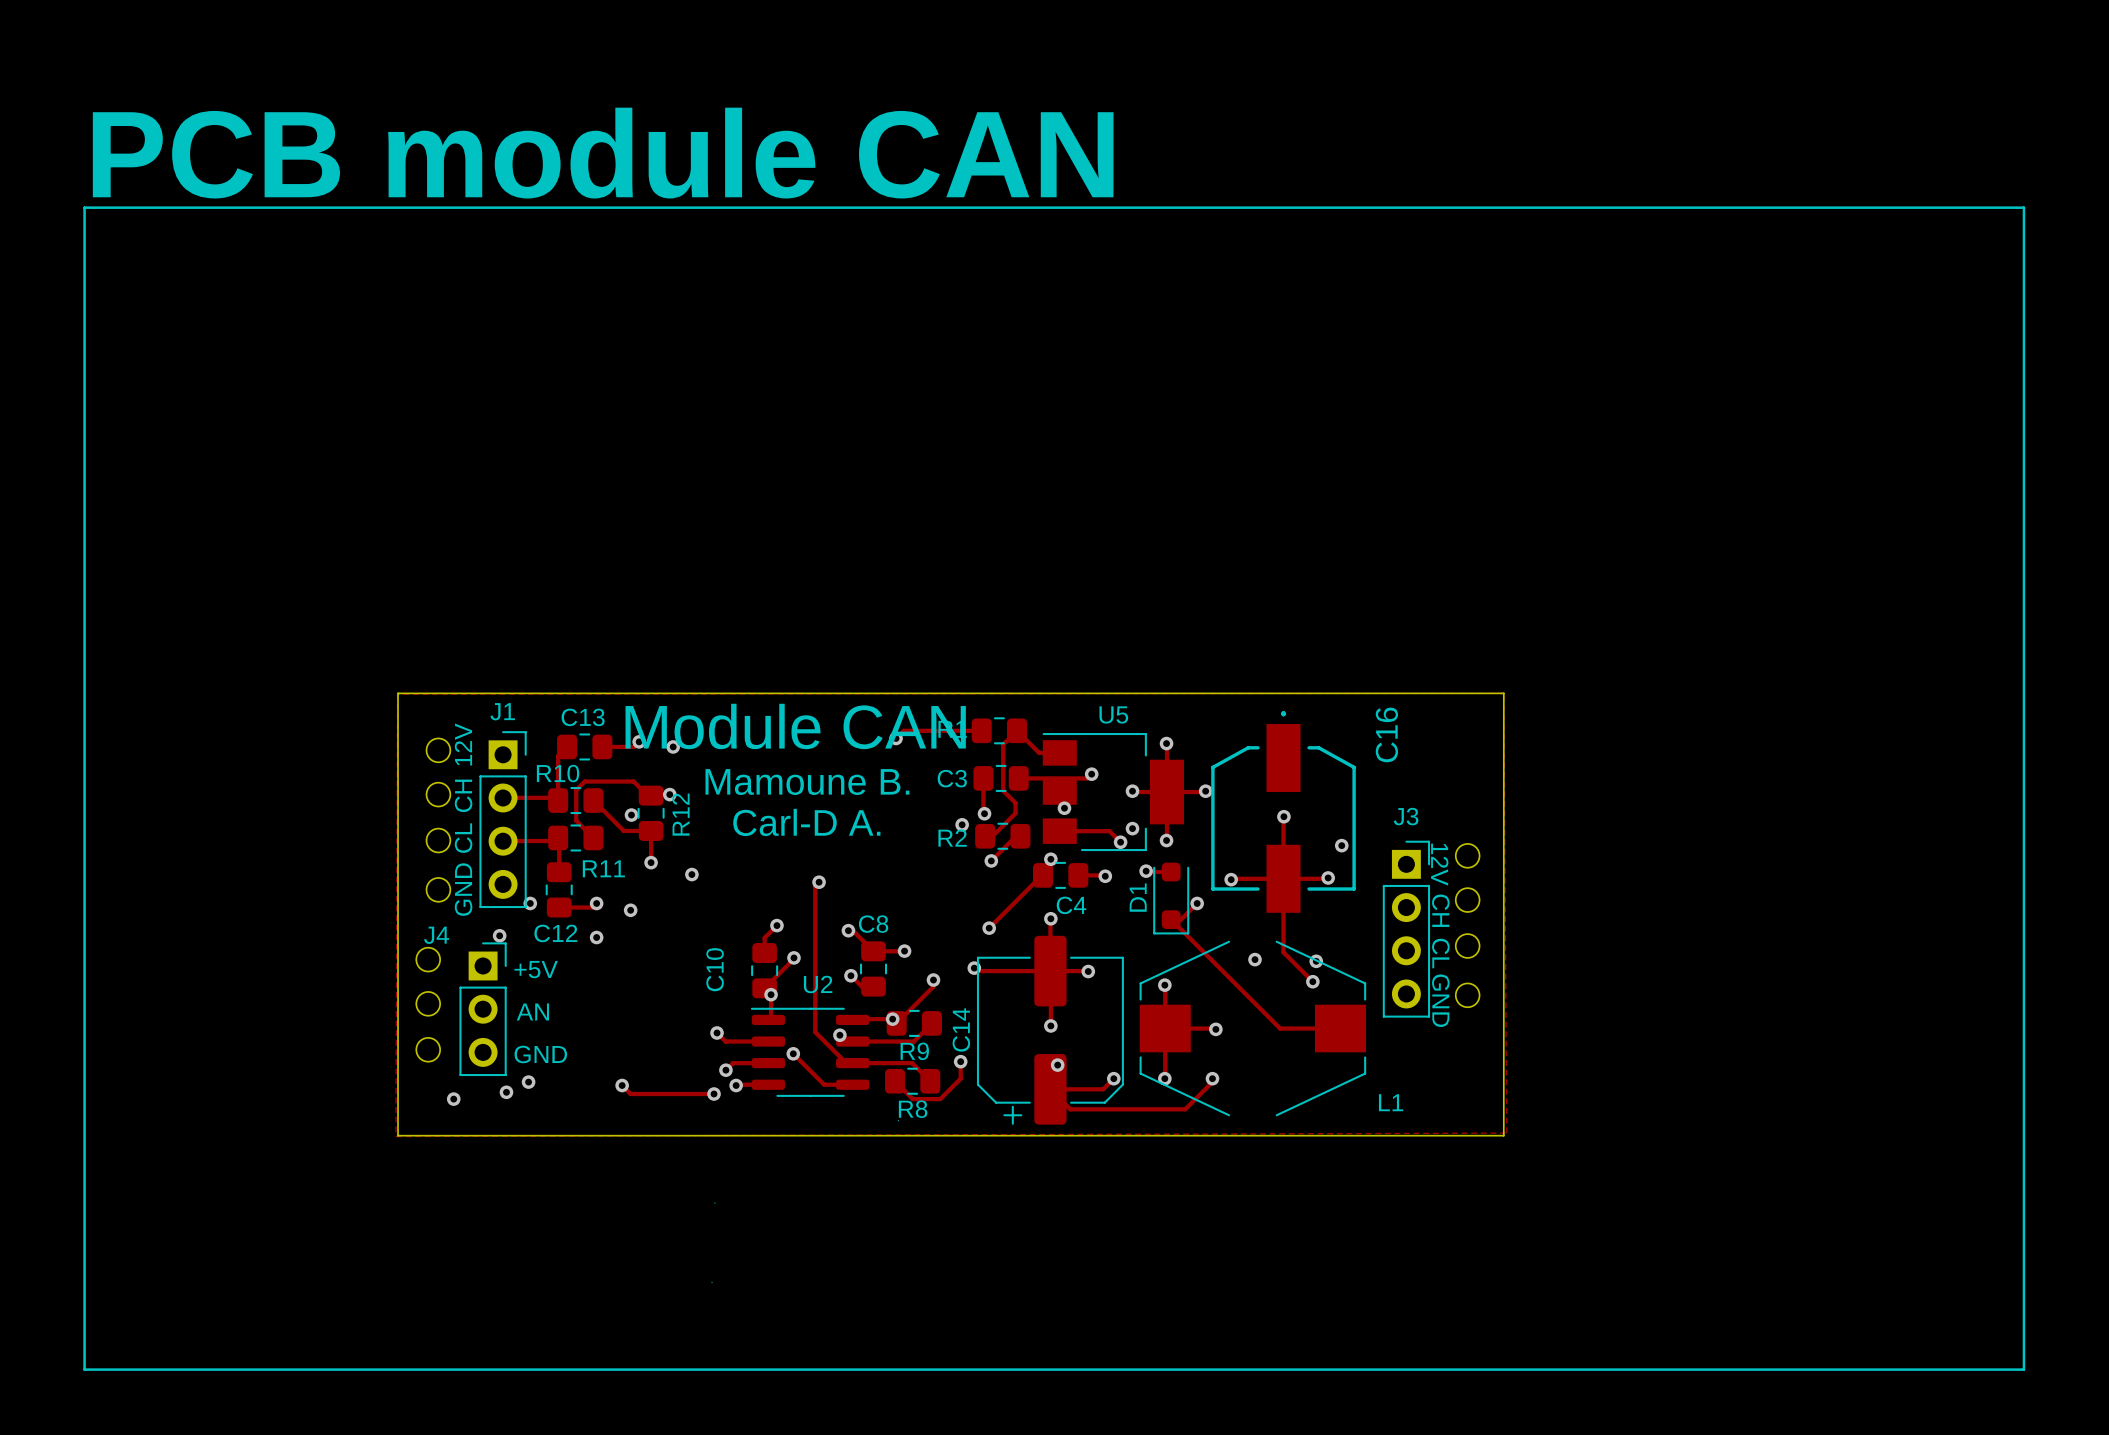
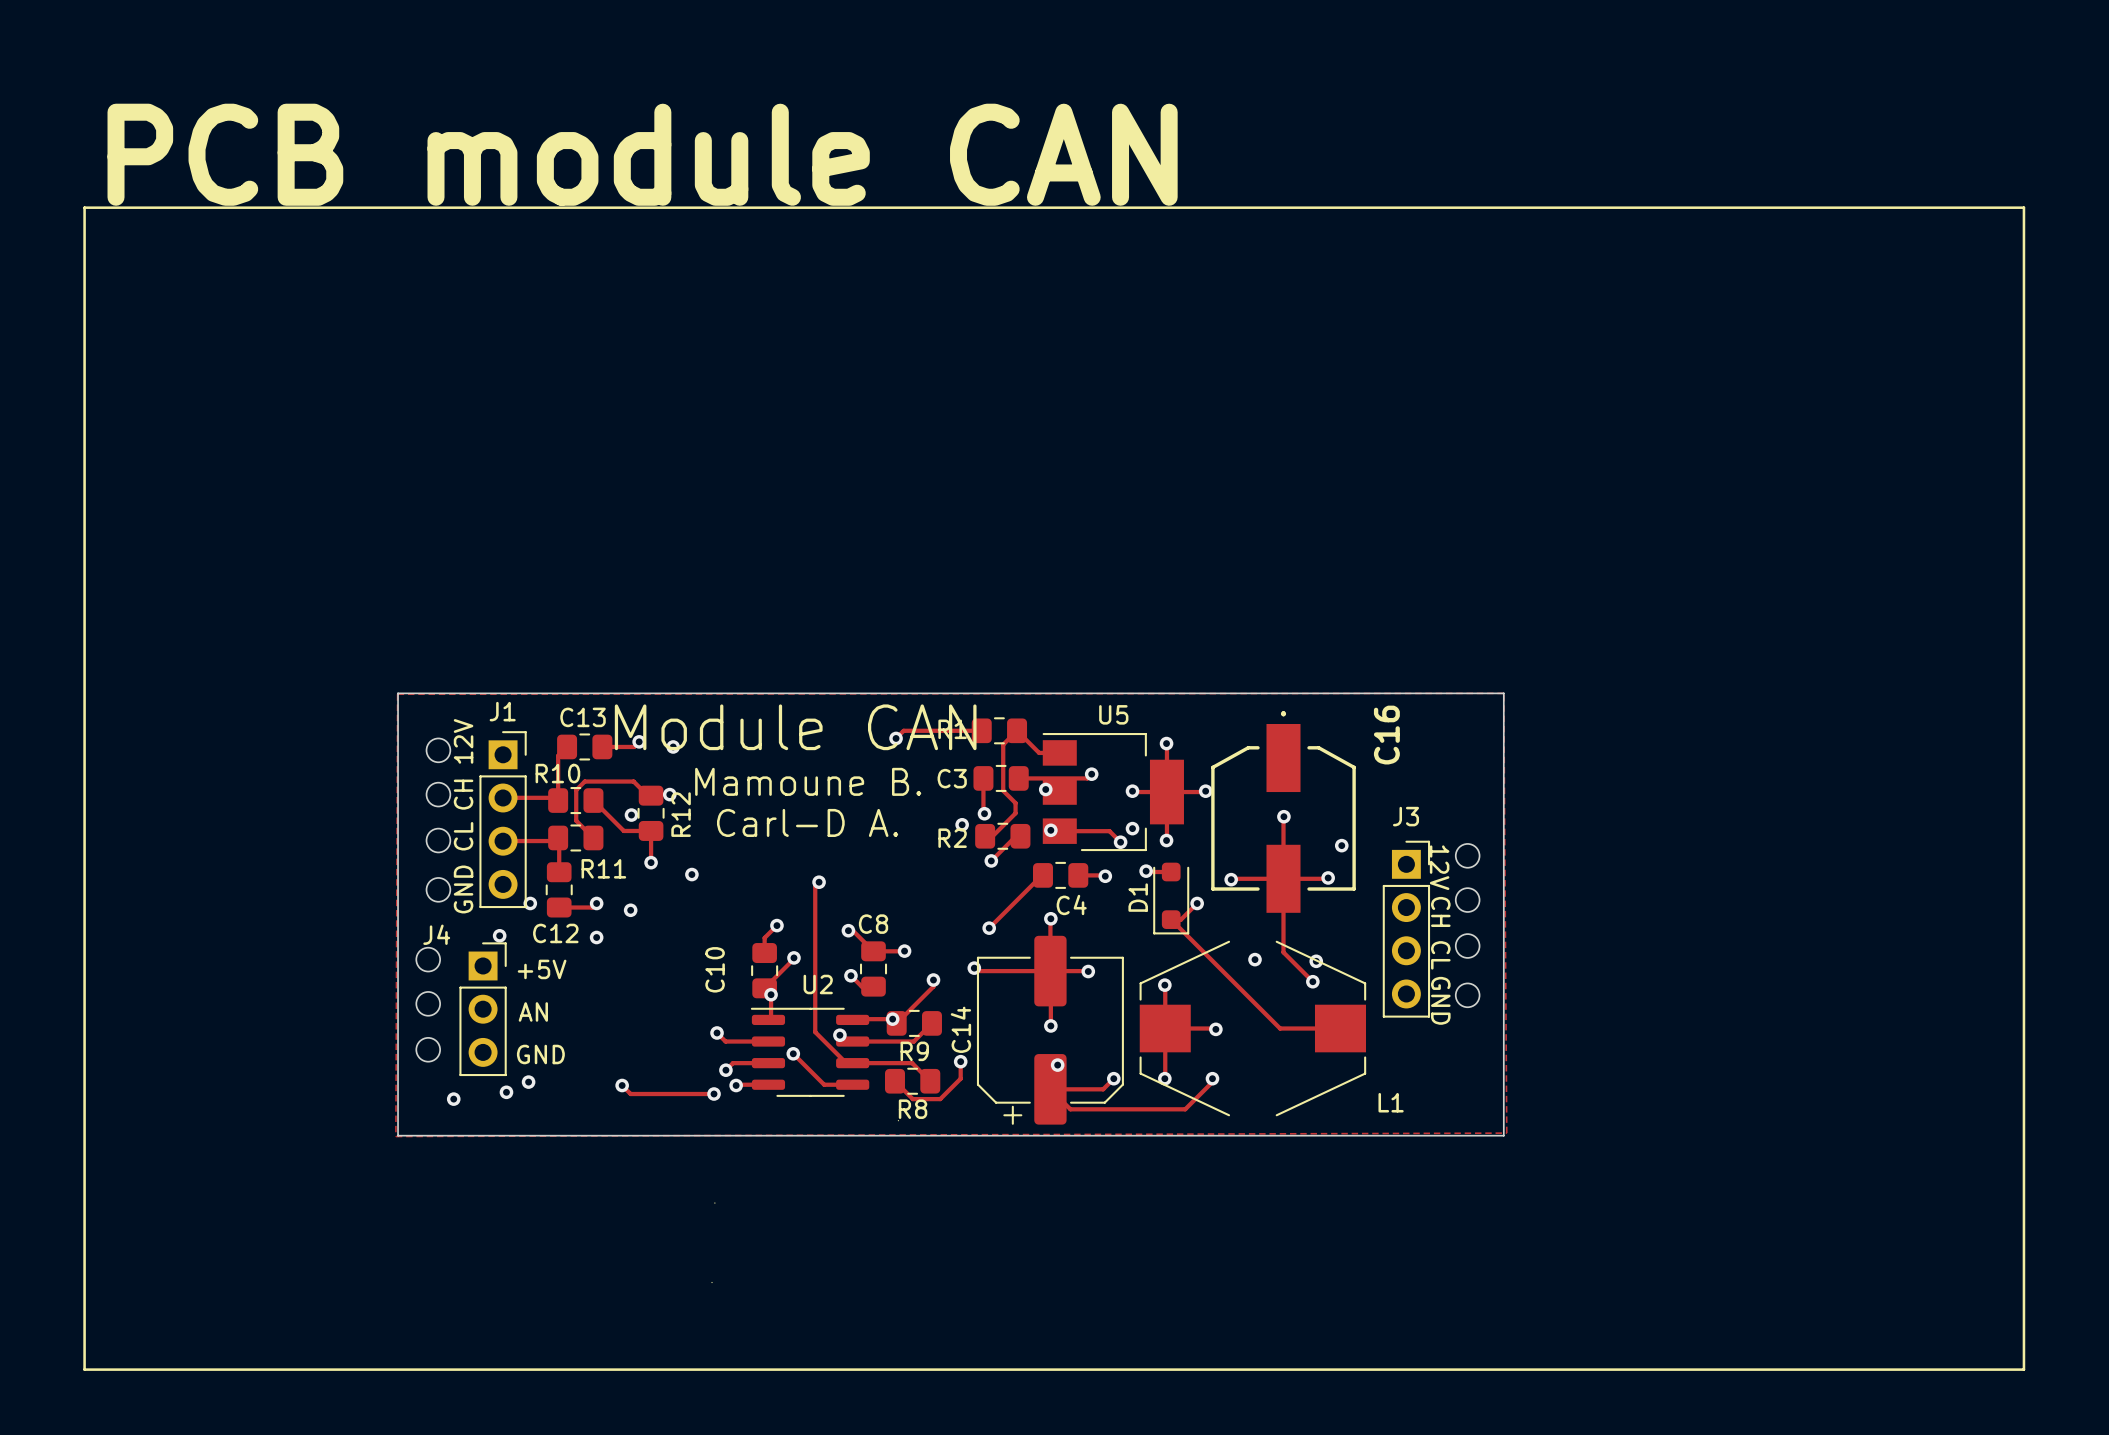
via: none -> (1045, 789)
via: (1064, 808) -> none
via: none -> (1050, 830)
via: (1050, 859) -> none

